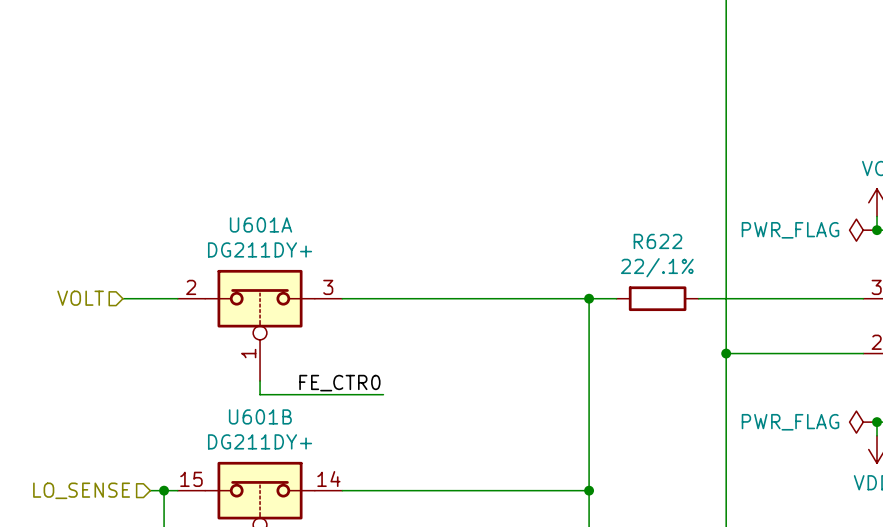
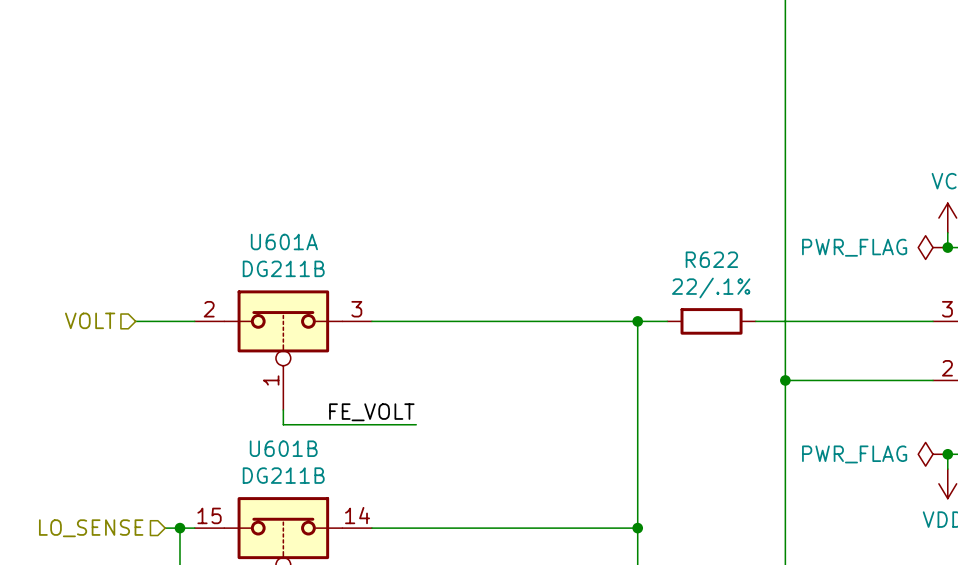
U601A value: DG211DY+ (260, 249) -> DG211B (283, 268)
label: FE_CTR0 (339, 383) -> FE_VOLT (371, 412)
U601B value: DG211DY+ (260, 441) -> DG211B (283, 475)

